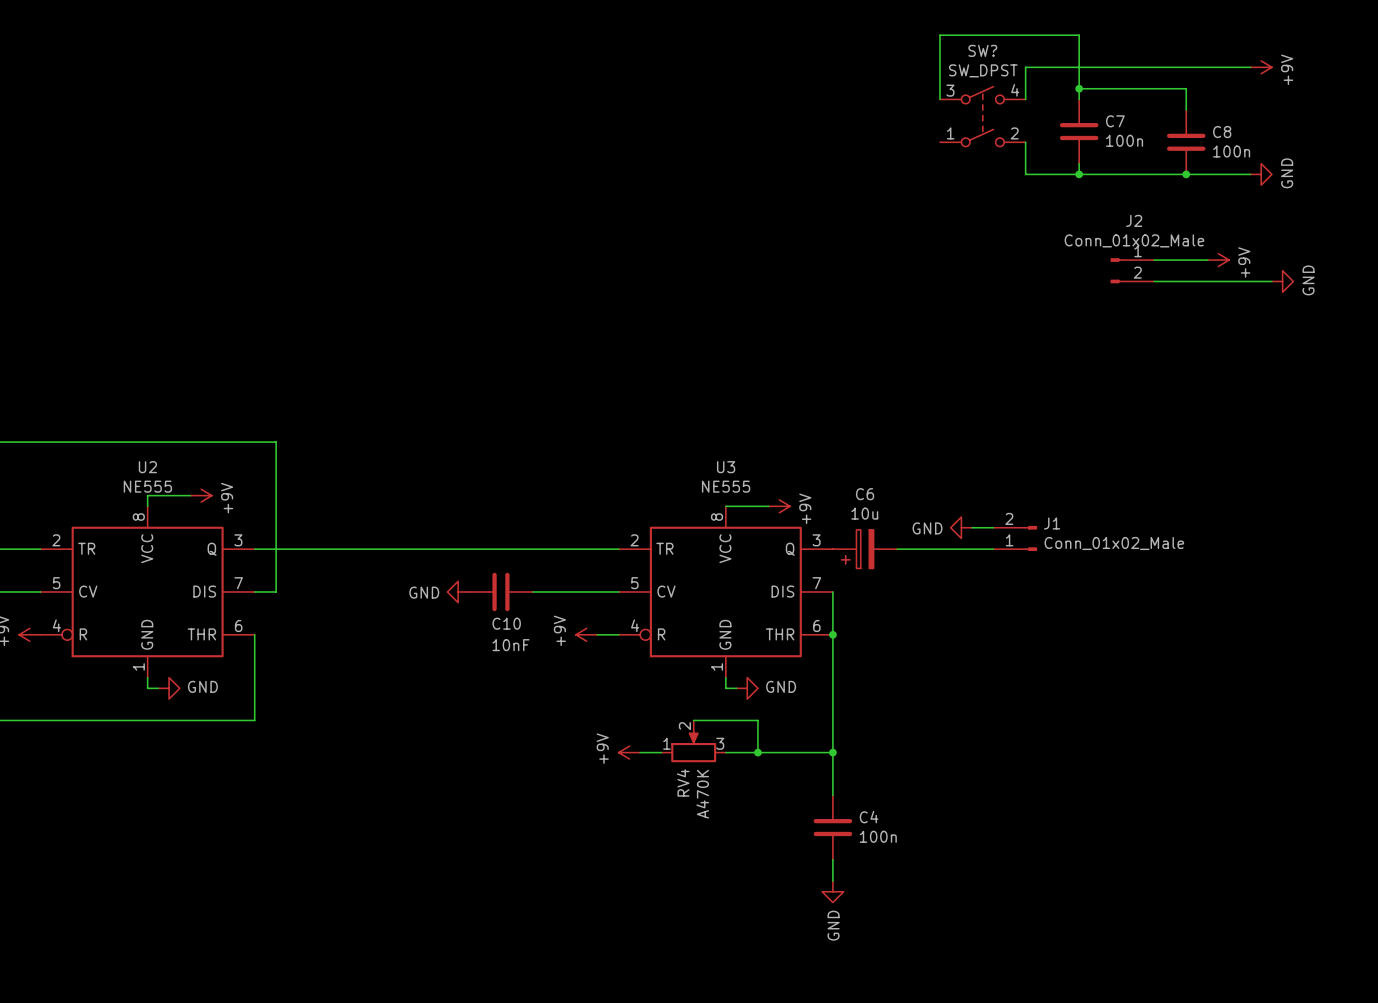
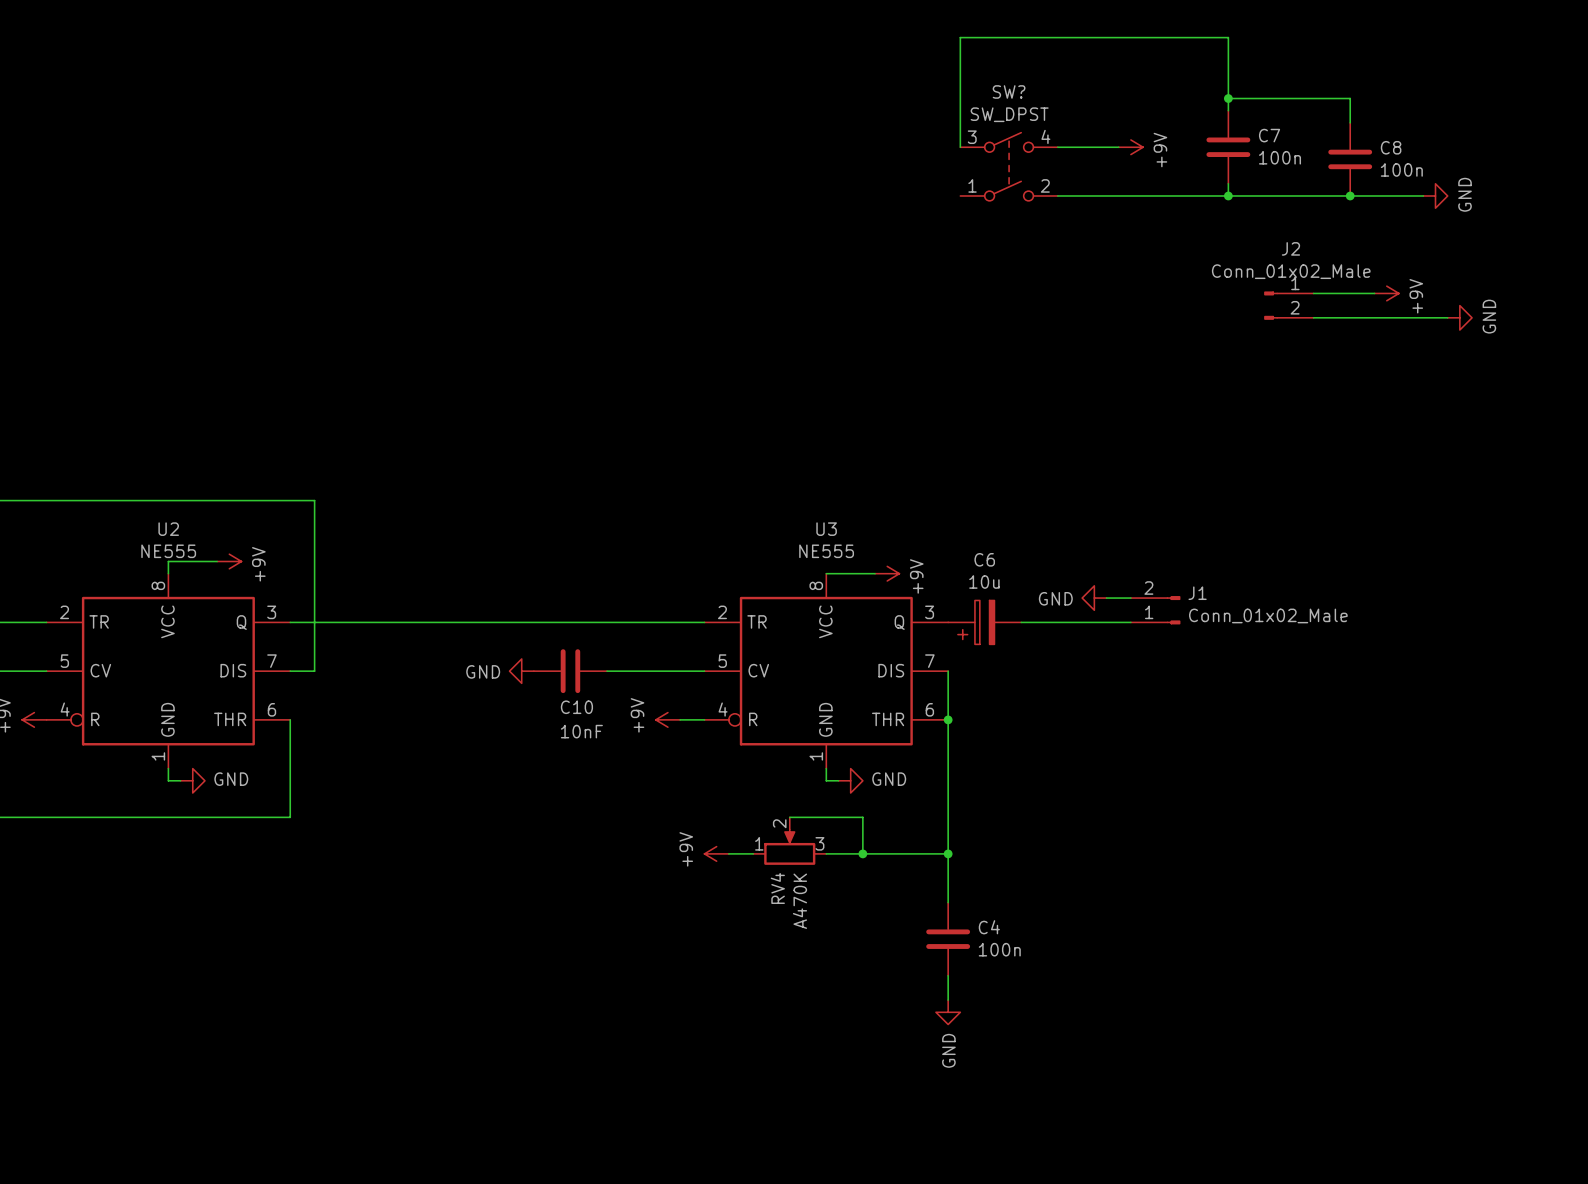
wire: (939, 35) (939, 99) -> (1069, 37) (960, 37) (960, 147)
wire: (1250, 67) (1025, 67) (1025, 99) -> none
power symbol: +9V (1261, 67) -> none
SW? position: (982, 116) -> (1009, 166)
wire: none -> (1057, 147) (1118, 147)
power symbol: none -> +9V (1130, 147)
wire: (1025, 142) (1025, 174) -> (1057, 195) (1167, 195)

